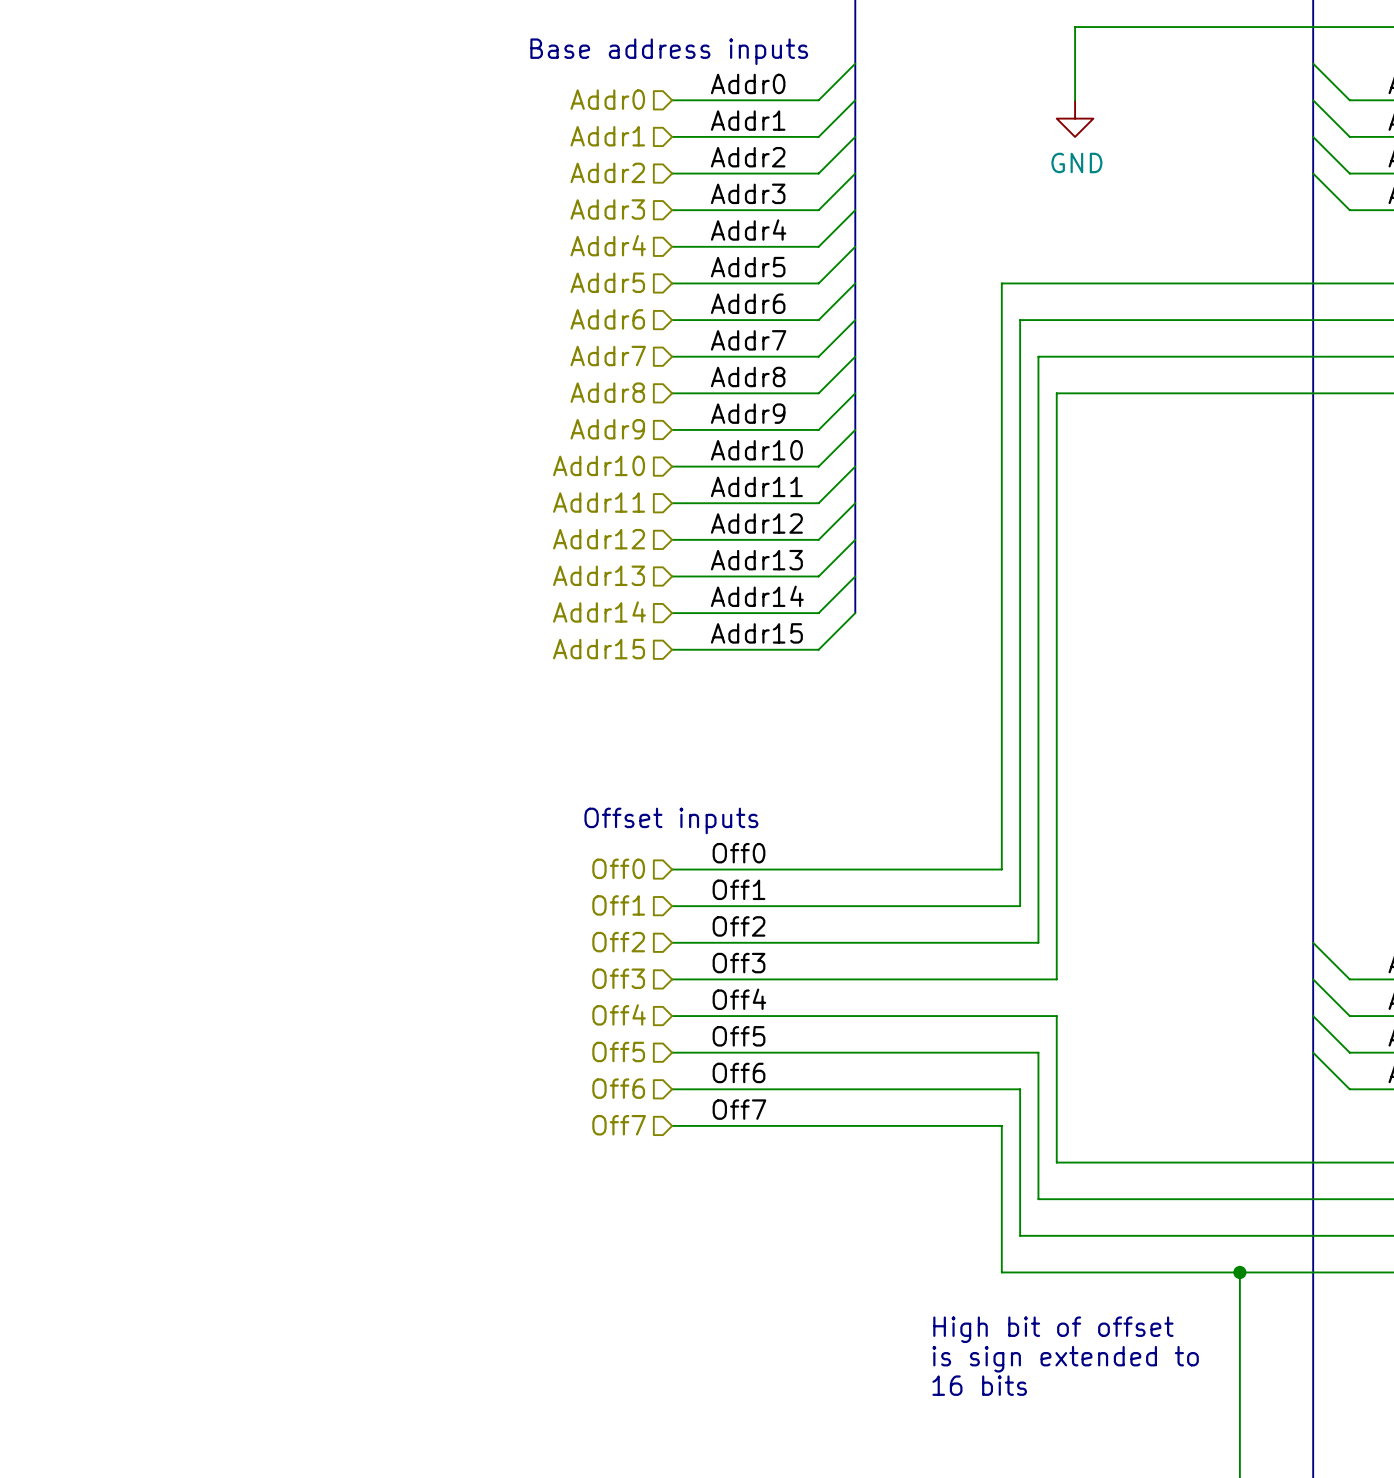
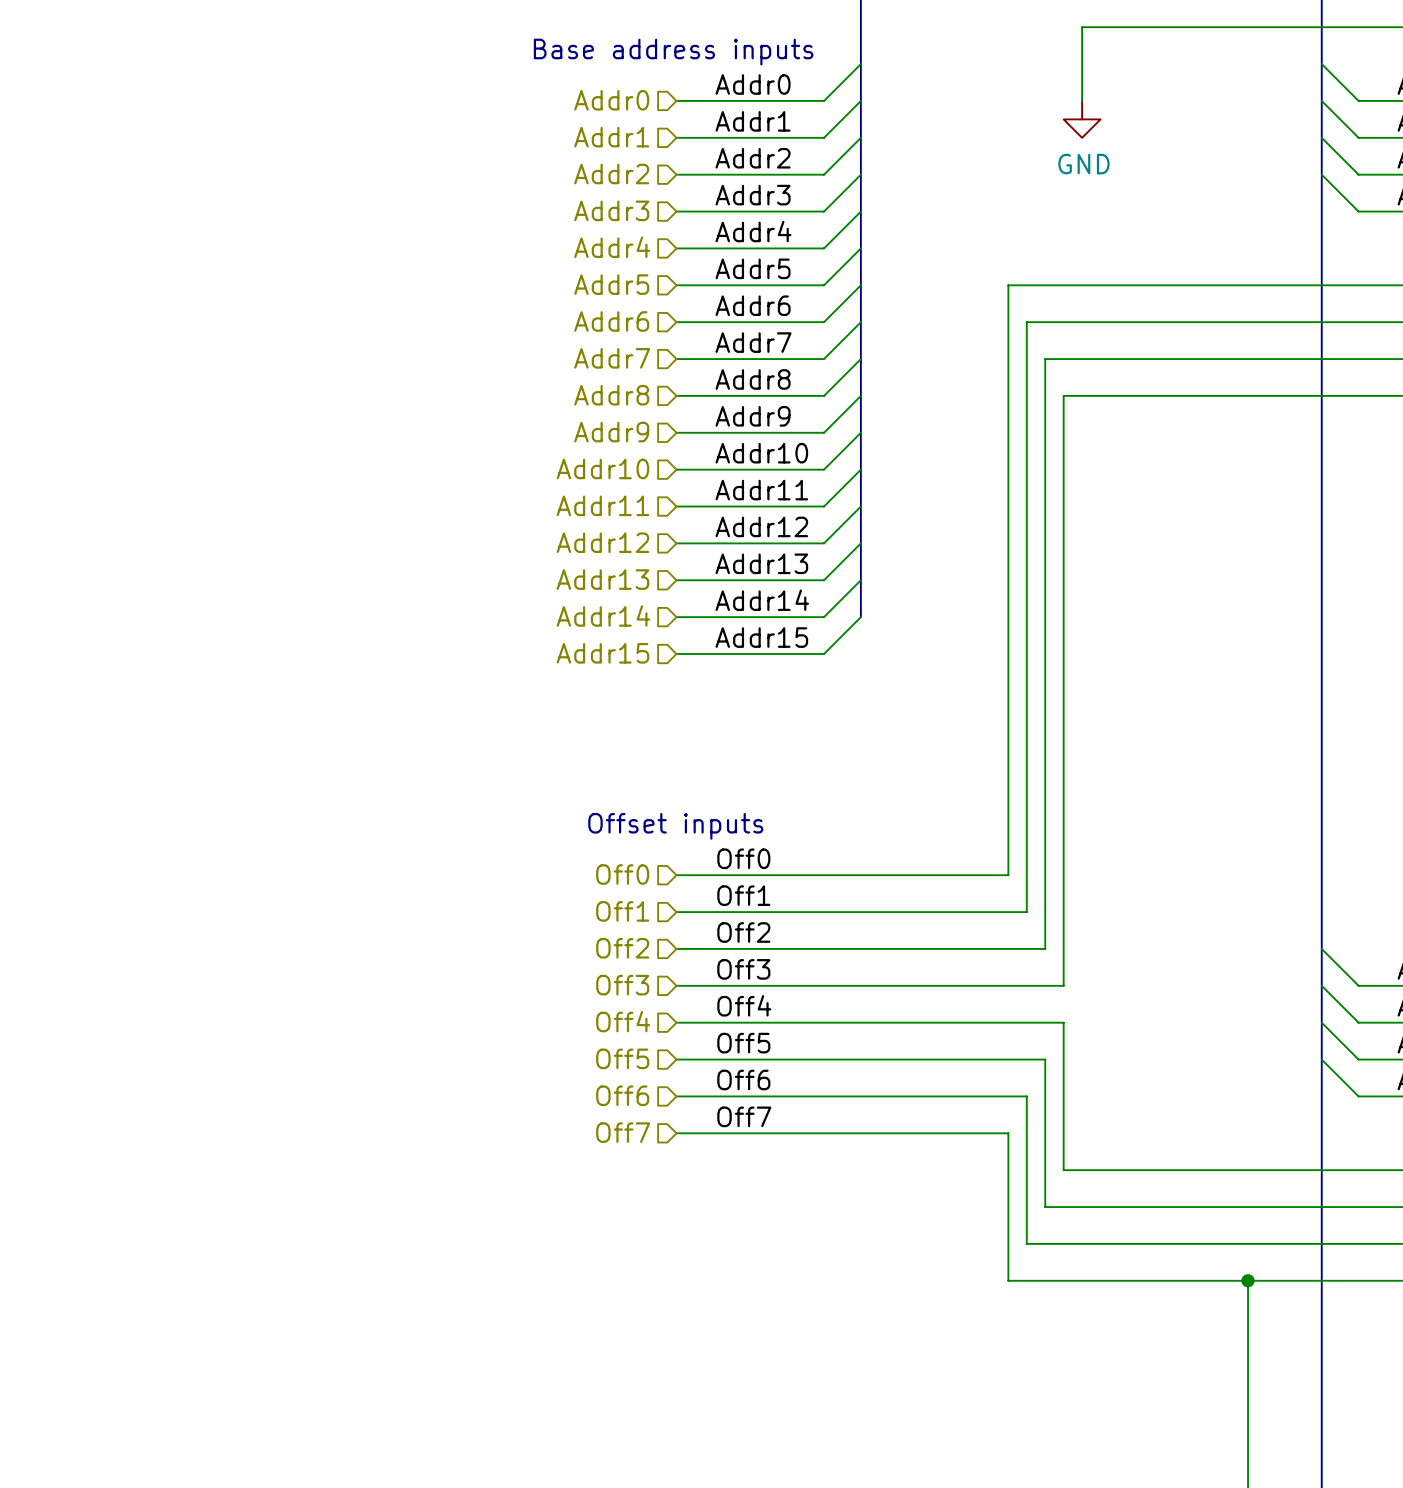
text: High bit of offset (1053, 1329) -> none
text: is sign extended to (1065, 1359) -> none
text: 16 bits (979, 1385) -> none

